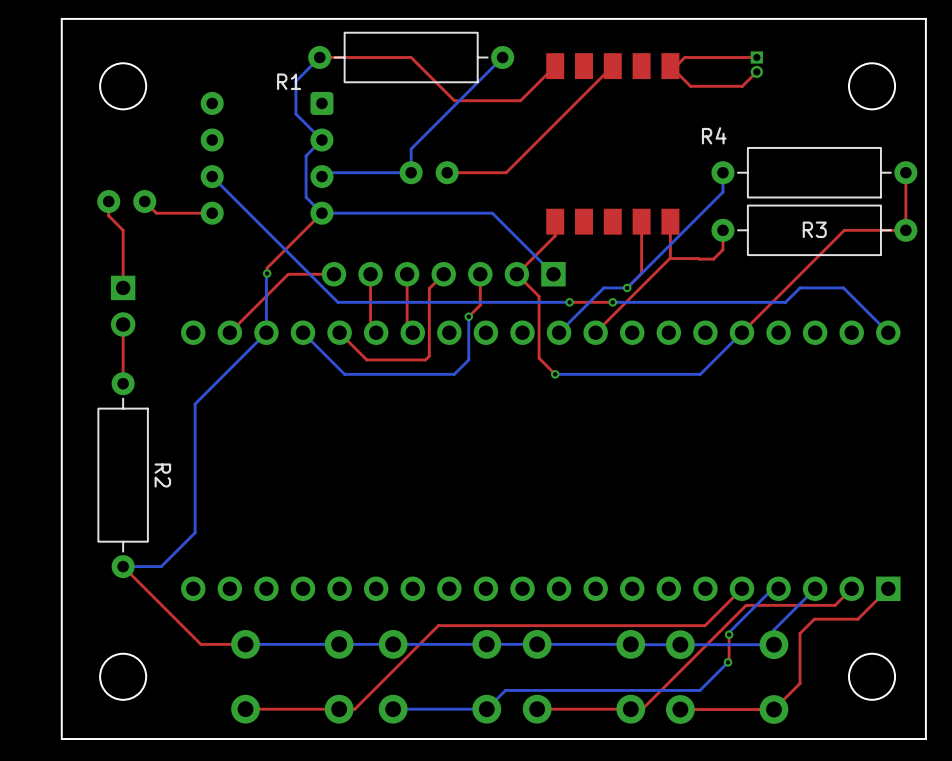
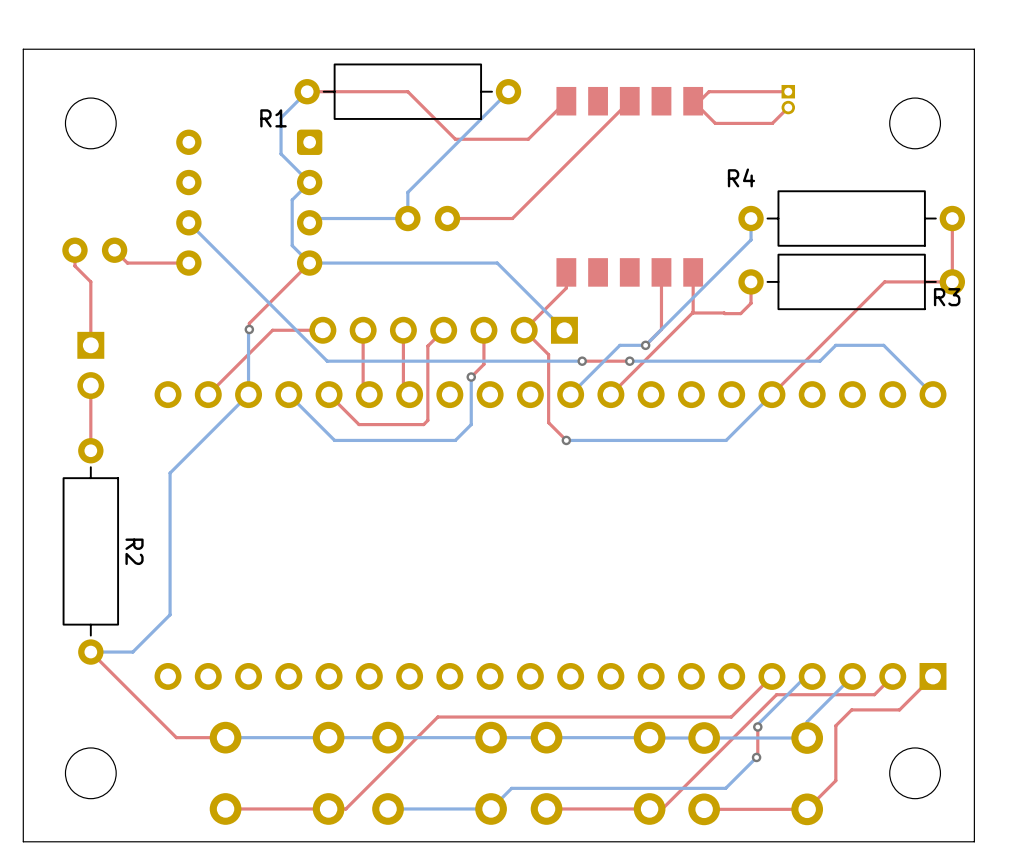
R3 name position: R3 (814, 229) -> R3 (947, 297)

